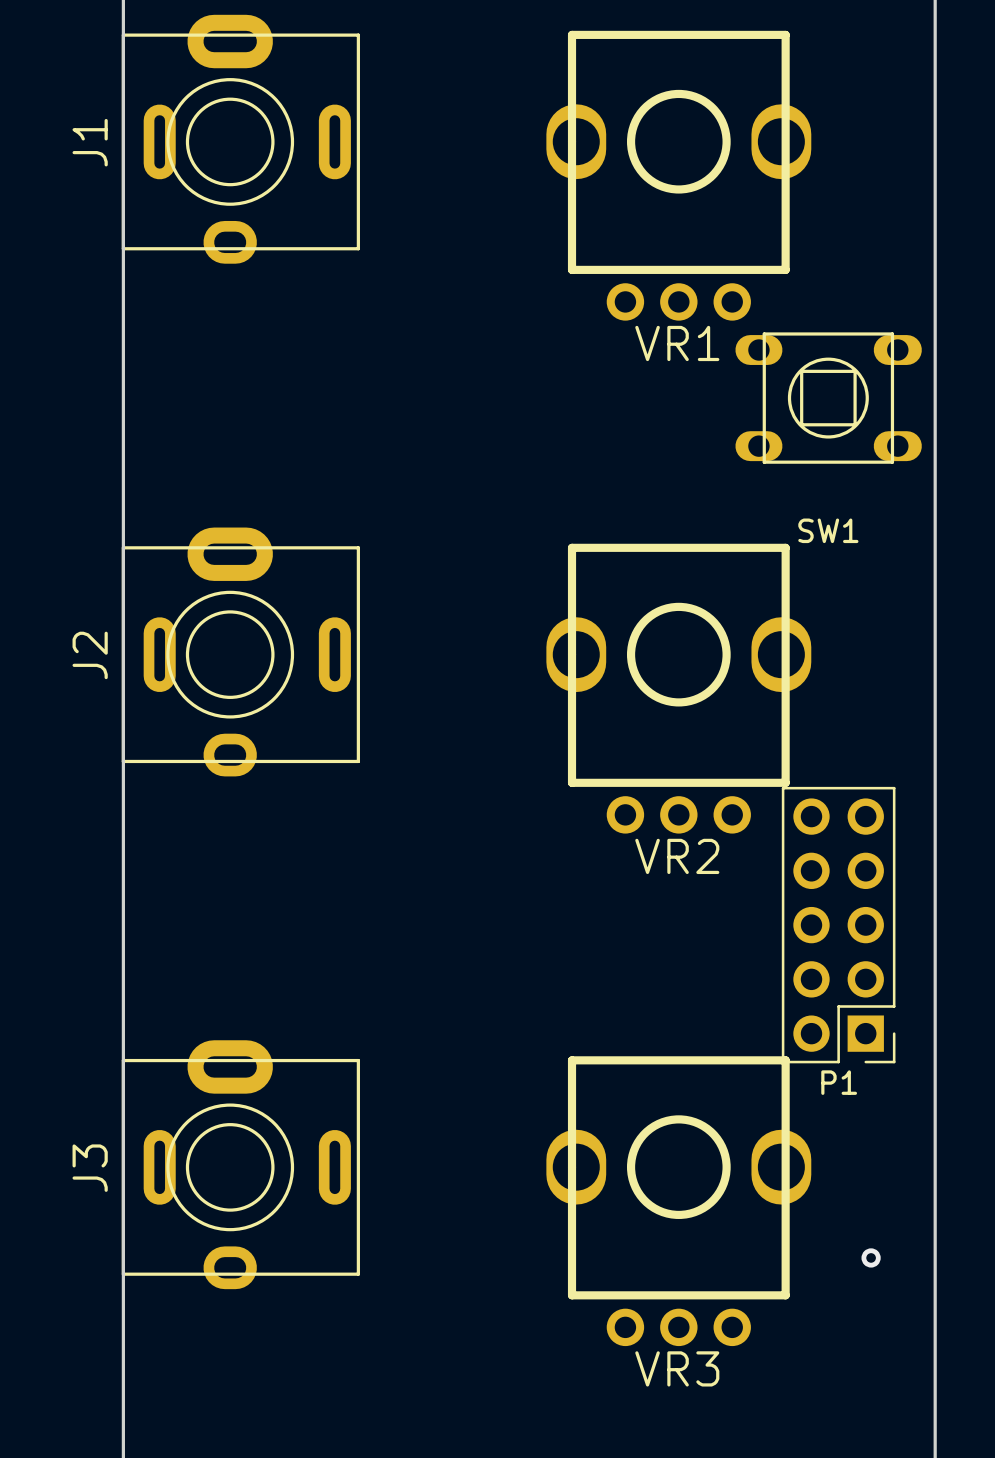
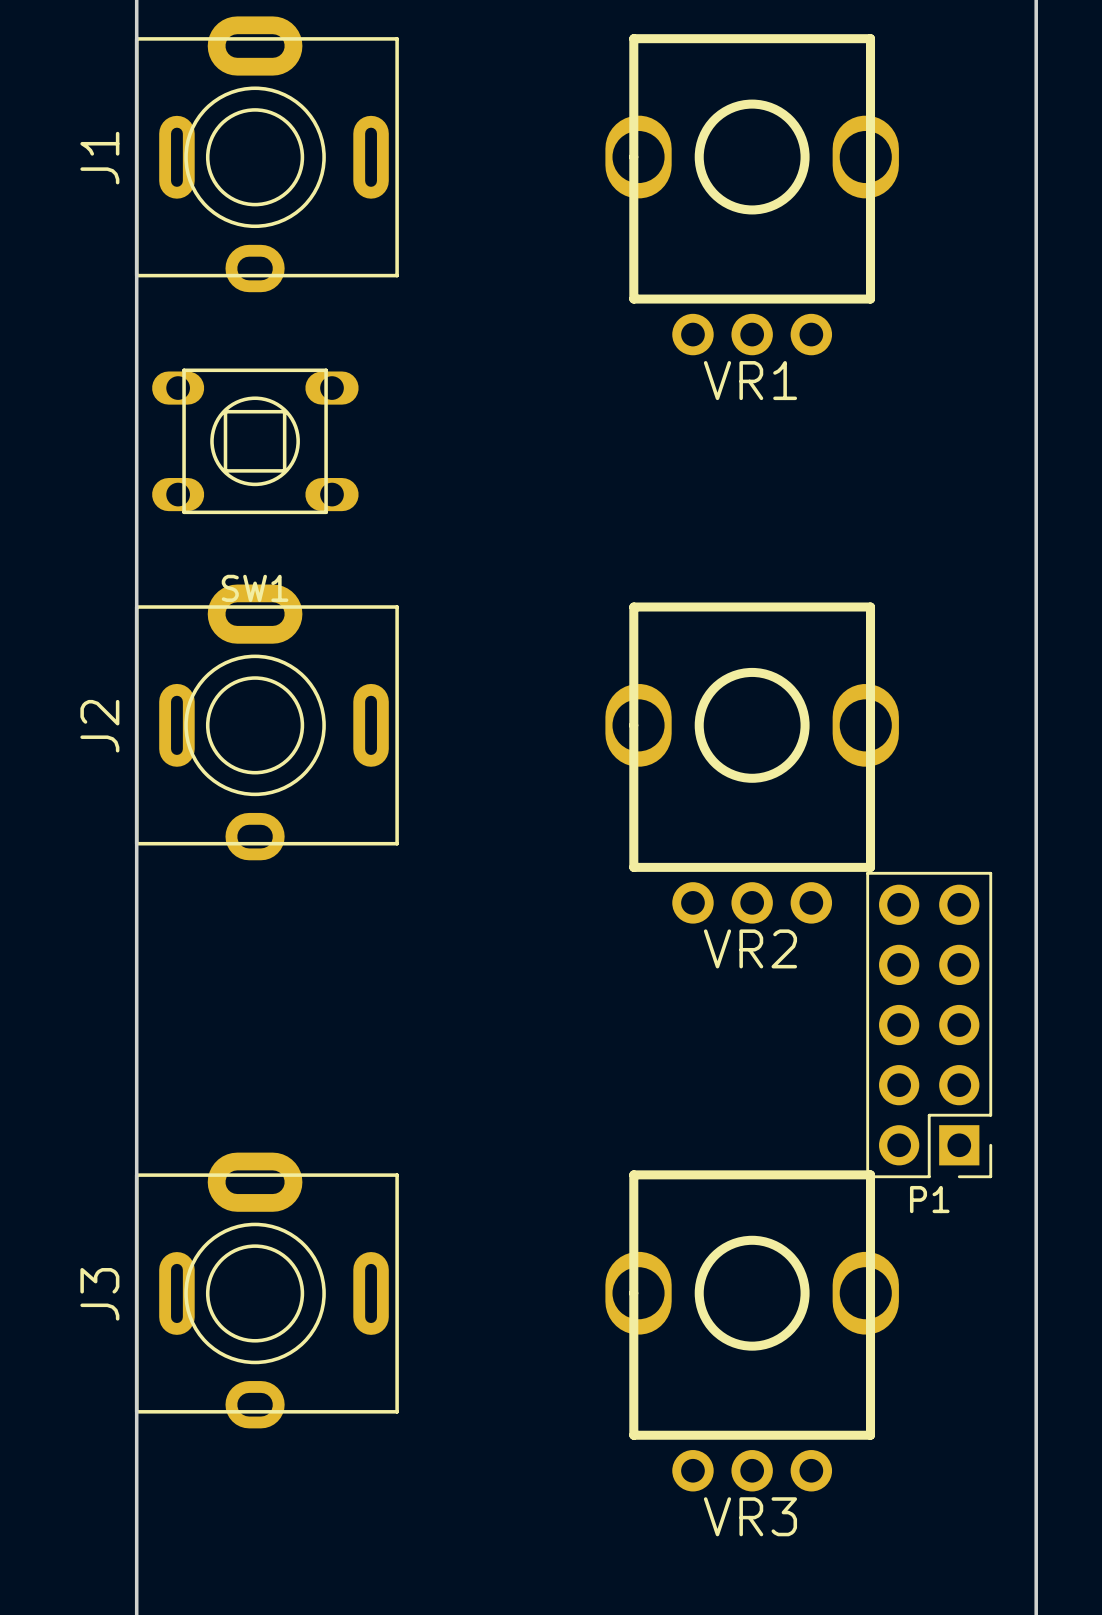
SW1 position: (828, 398) -> (255, 441)
via: (871, 1257) -> none

